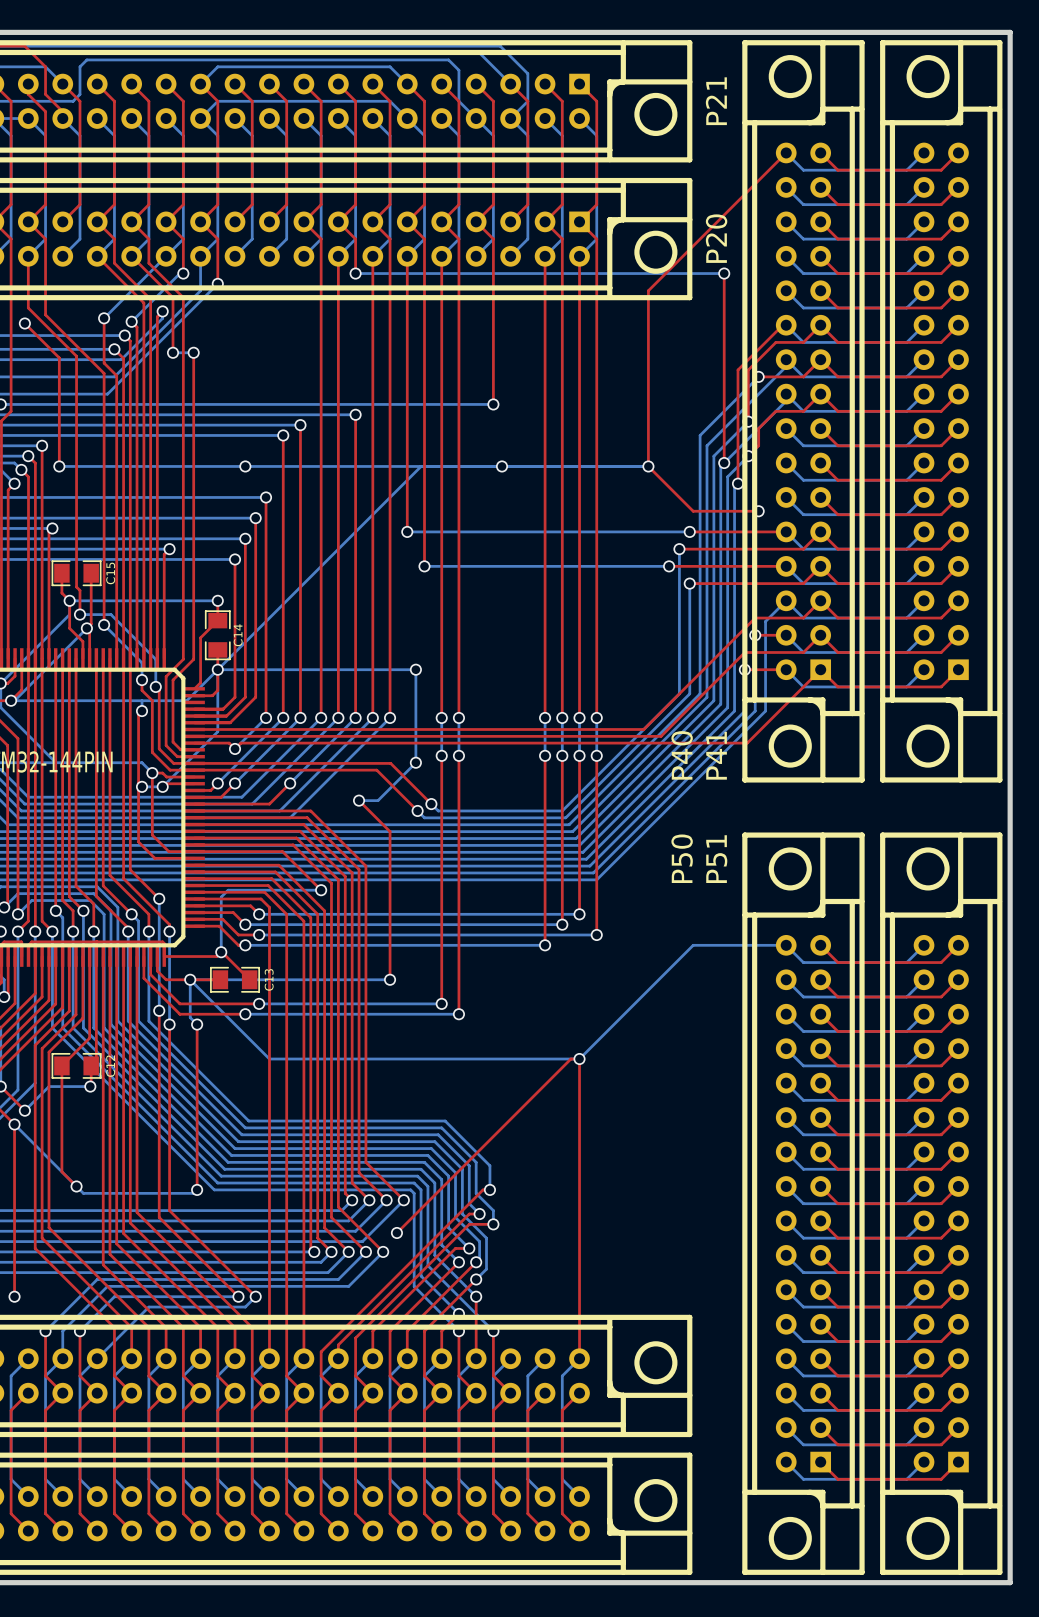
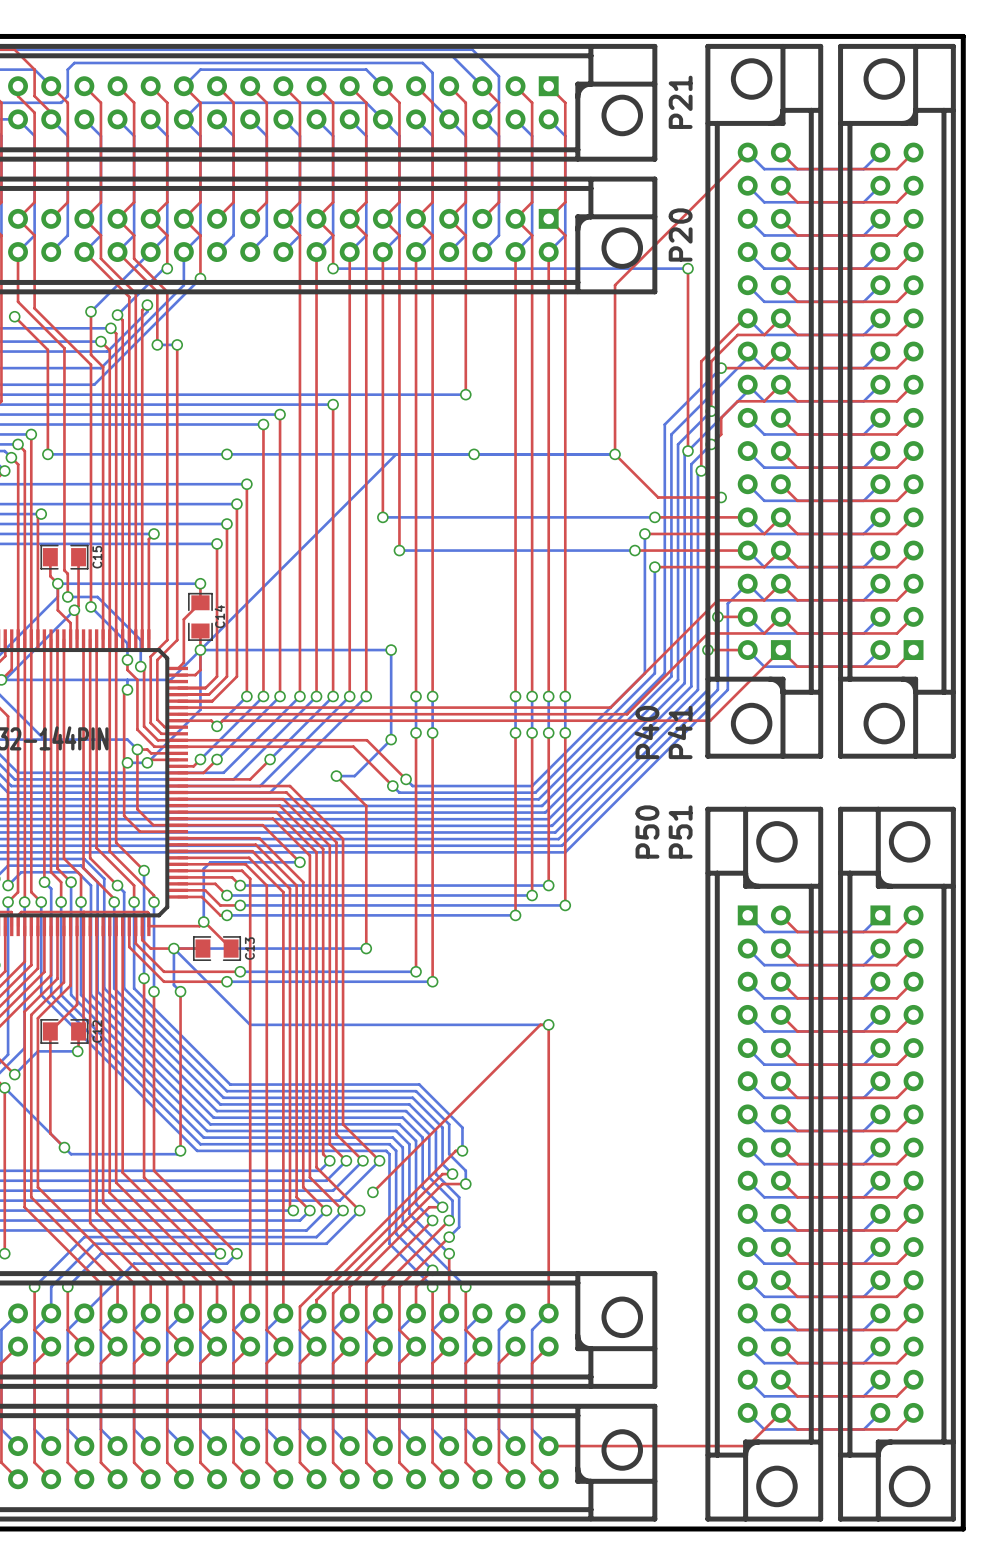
bottom track: (786, 945) (693, 945) (579, 1059) -> none
P50 rotation: 0° (803, 1203) -> 180° (764, 1164)
P51 rotation: 0° (941, 1203) -> 180° (896, 1164)
top track: none -> (780, 1412) (747, 1446) (548, 1446)

